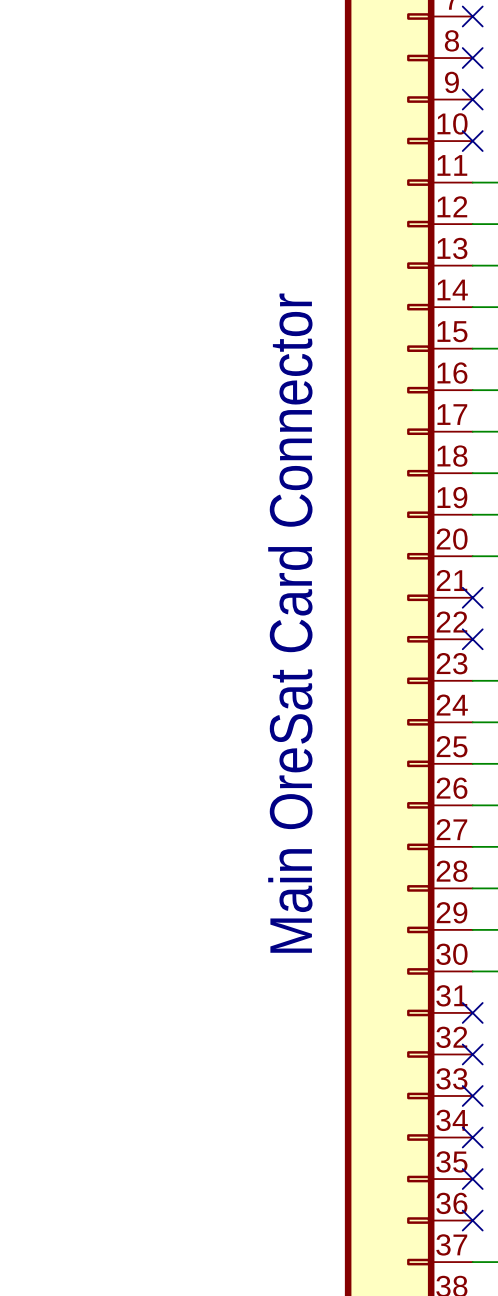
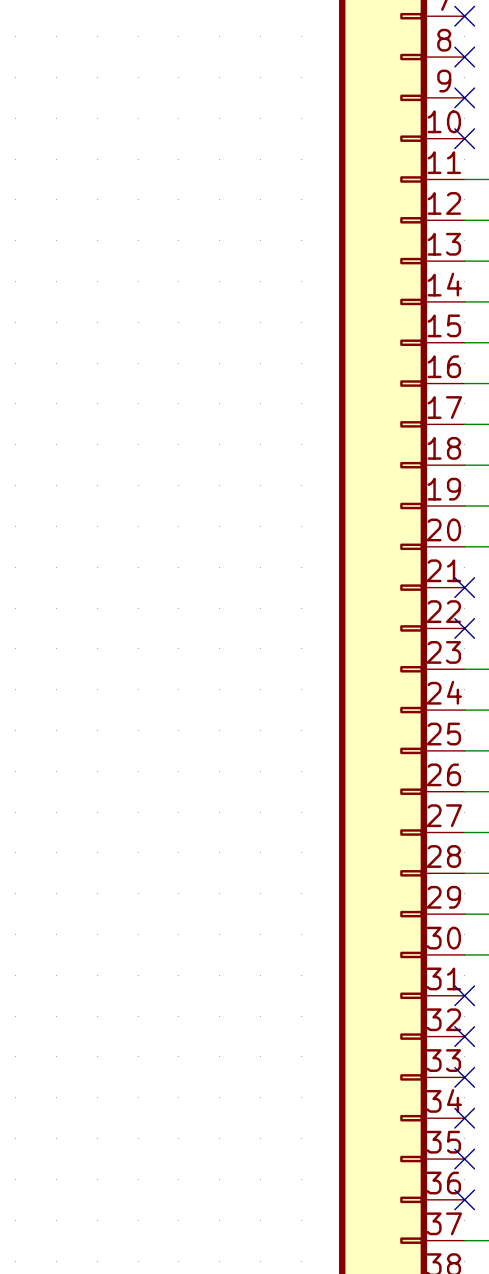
text: Main OreSat Card Connector (290, 623) -> none

